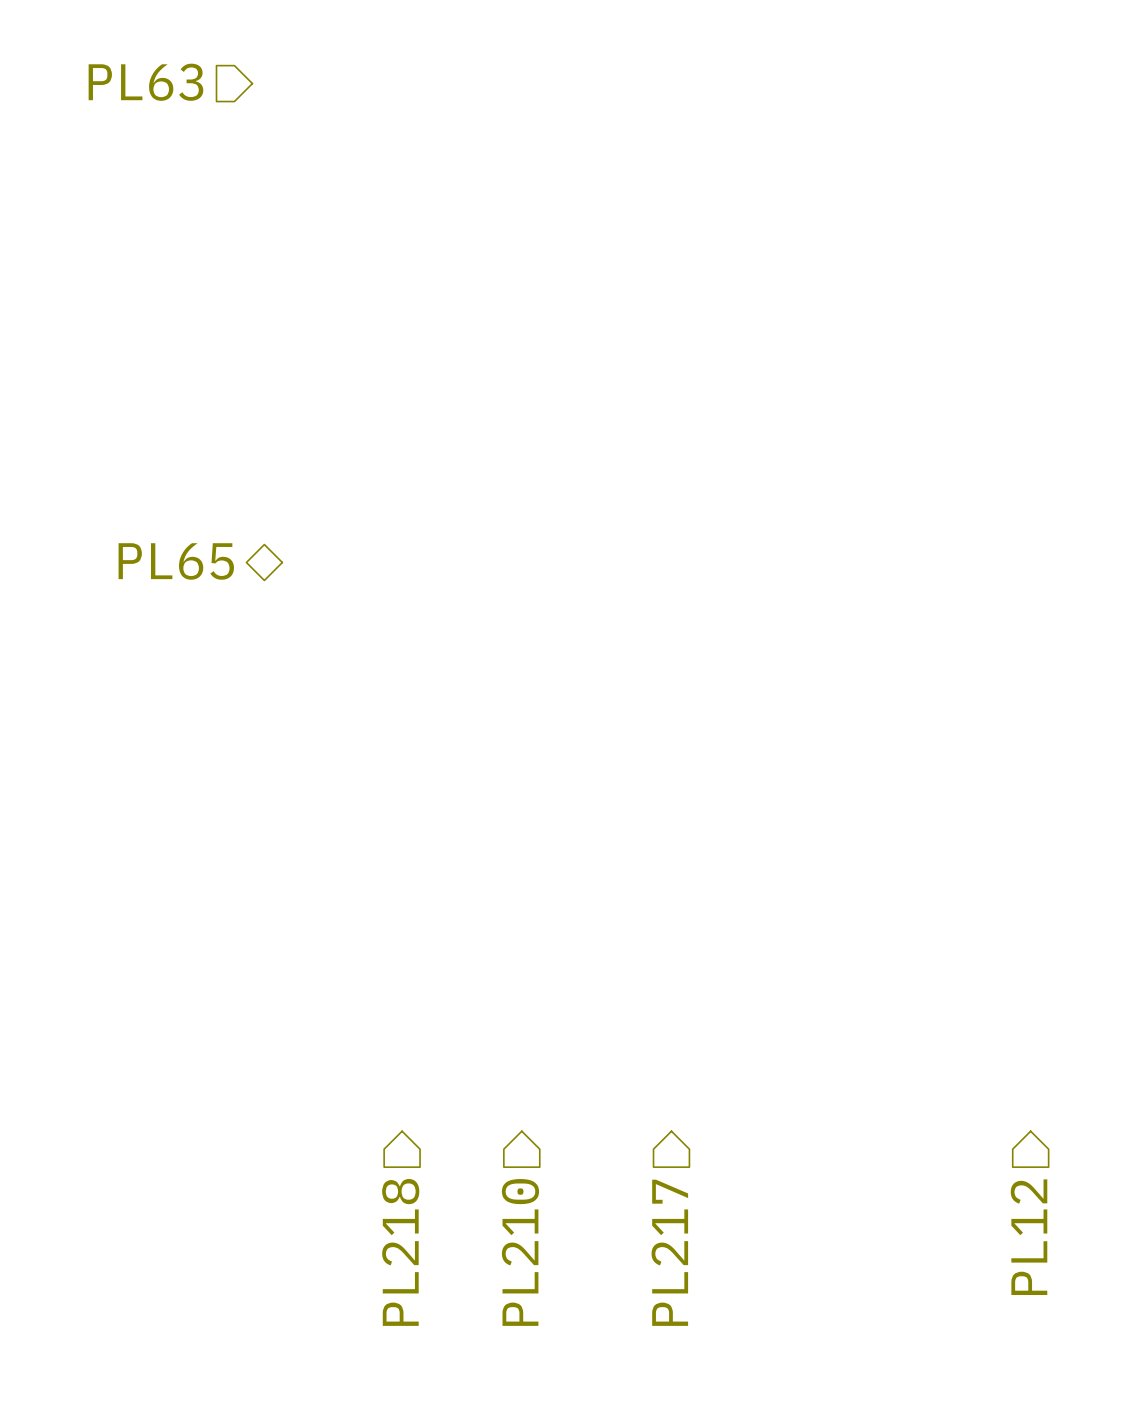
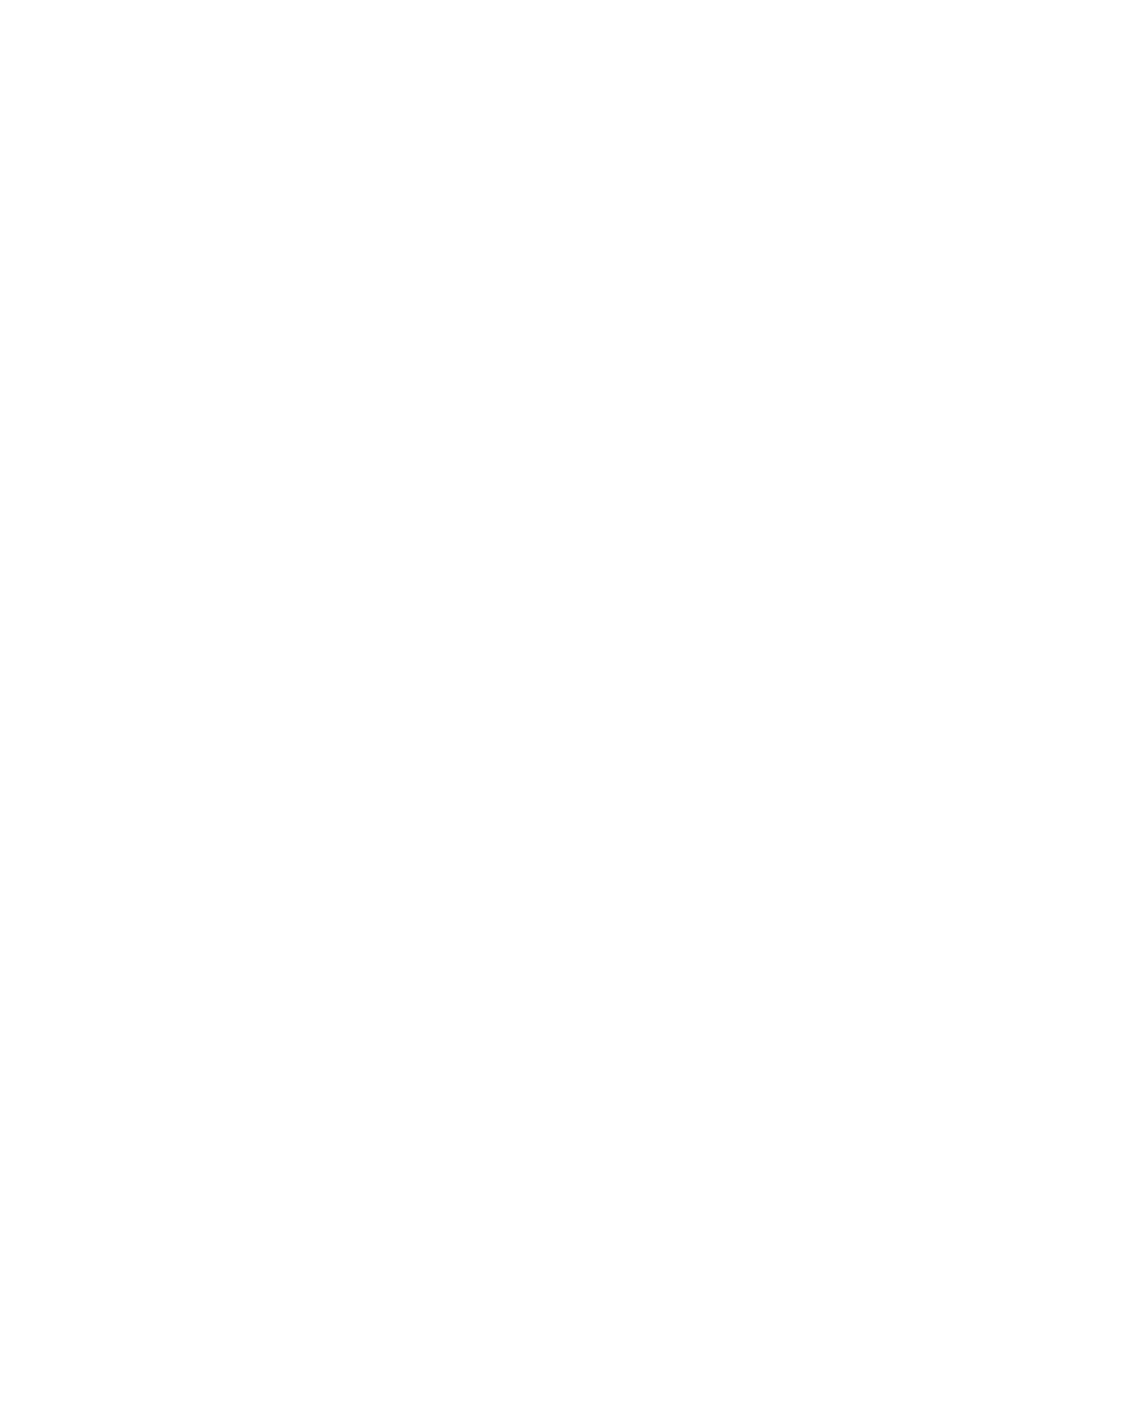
hierarchical label: PL63 (145, 82) -> none
hierarchical label: PL65 (176, 561) -> none
hierarchical label: PL12 (1029, 1237) -> none
hierarchical label: PL218 (400, 1252) -> none
hierarchical label: PL210 (520, 1252) -> none
hierarchical label: PL217 (669, 1252) -> none

